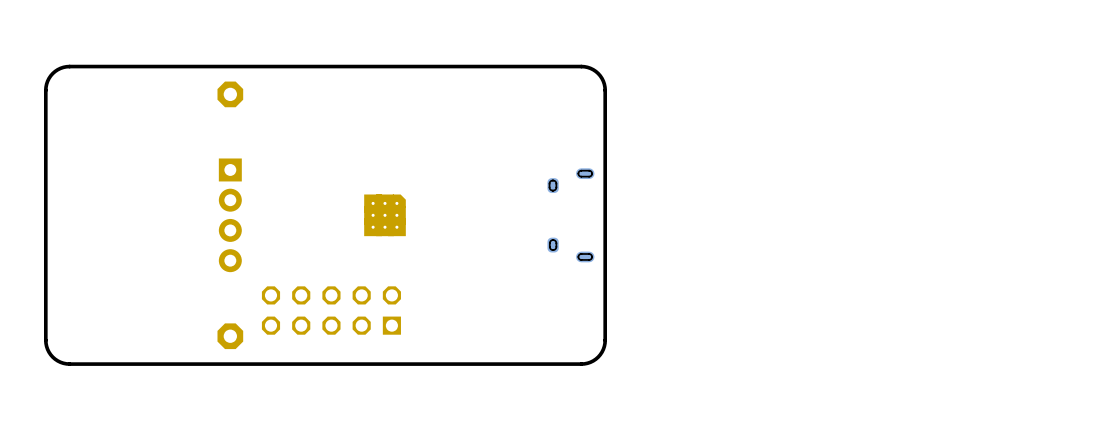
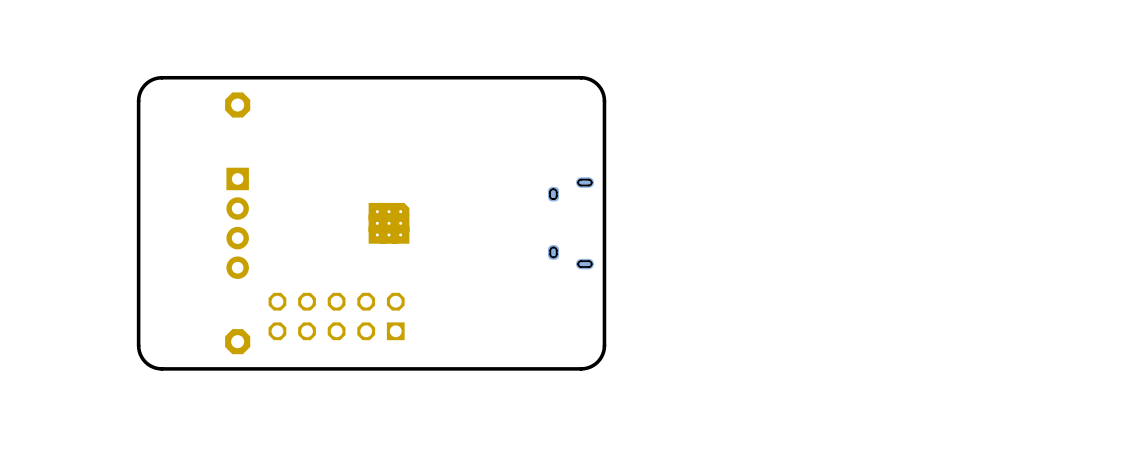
board edge: (152, 66) (63, 67) (50, 75) (45, 90) (45, 340) (47, 349) (55, 359) (66, 363) (152, 364) -> (161, 77) (153, 79) (145, 84) (140, 92) (138, 101) (138, 348) (141, 357) (147, 364) (161, 368)

